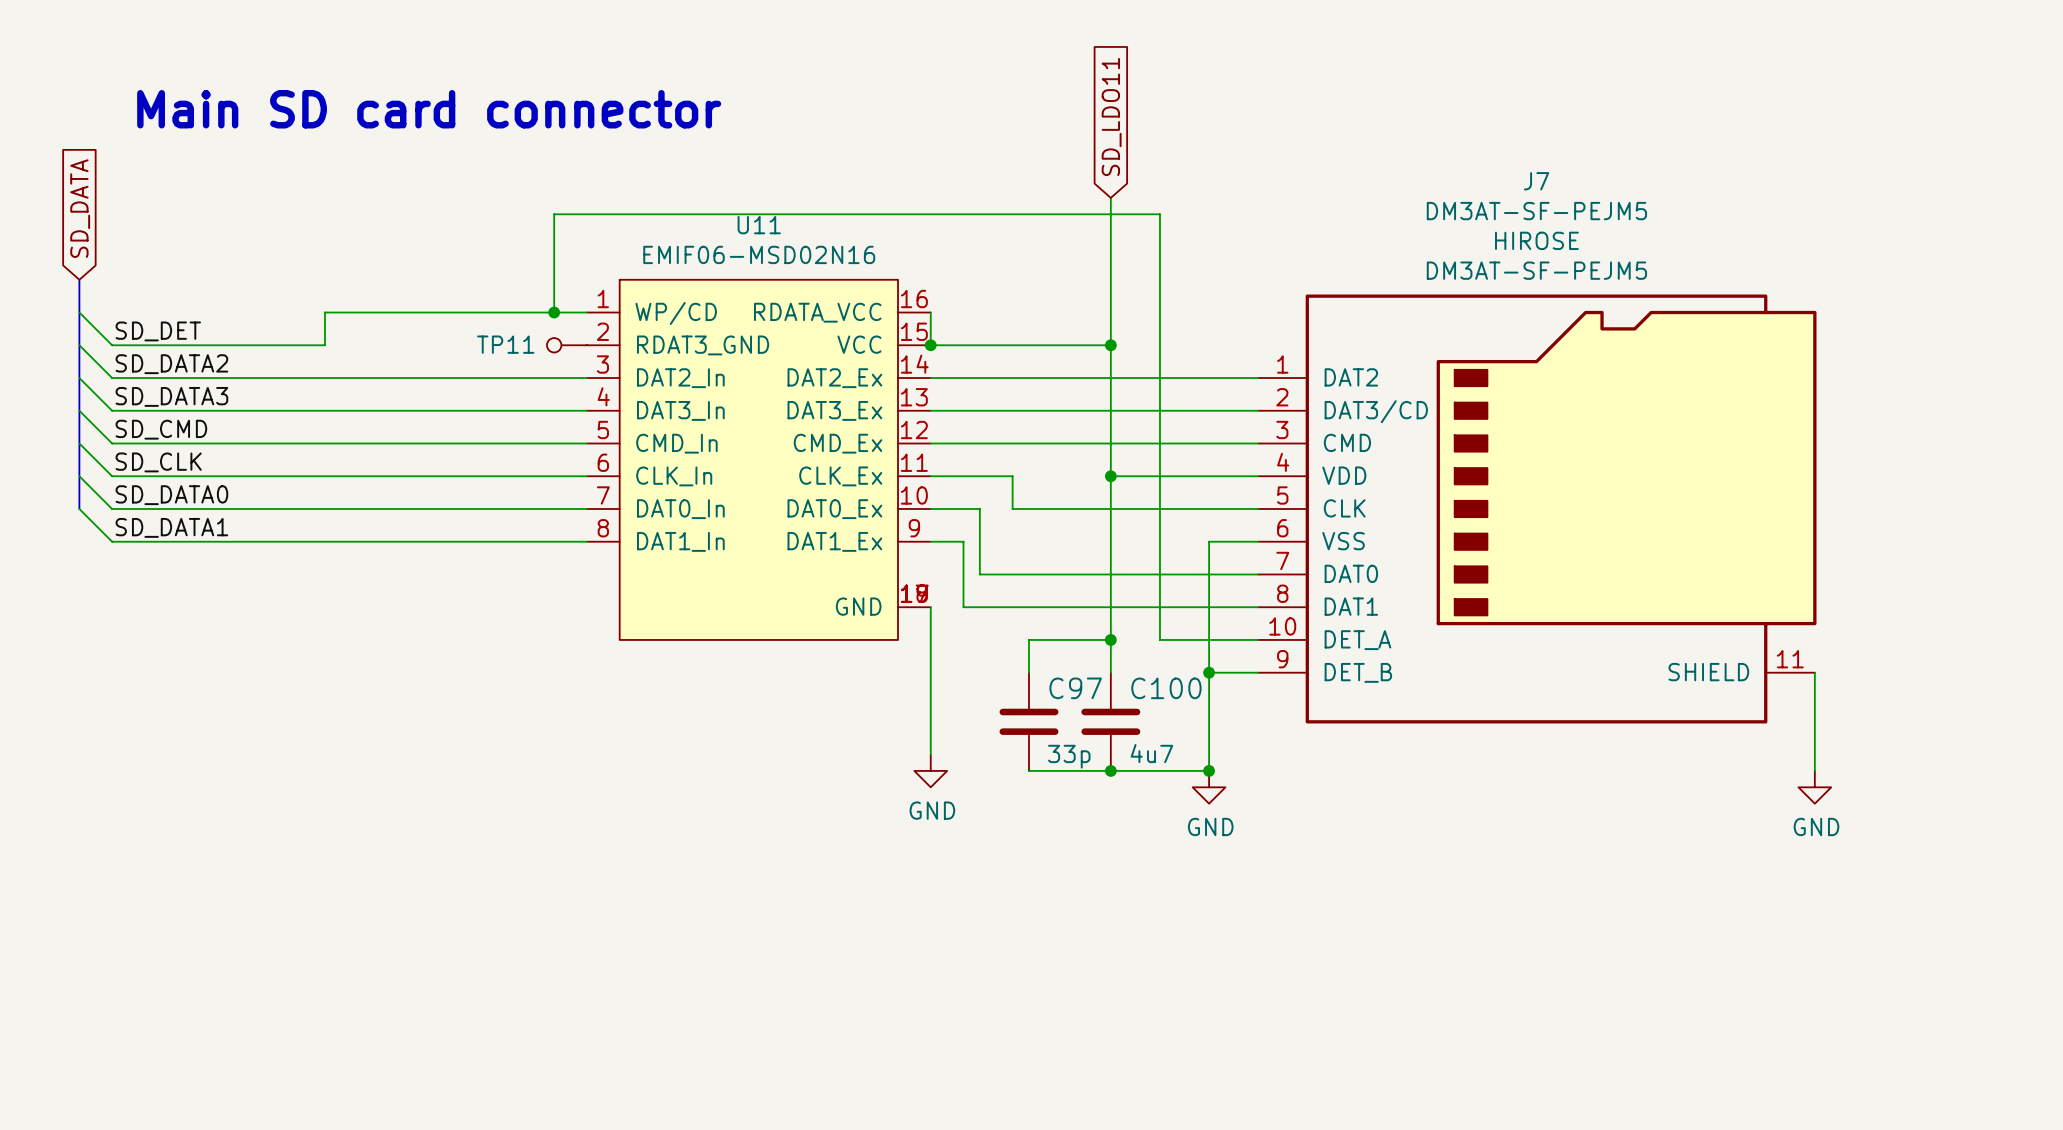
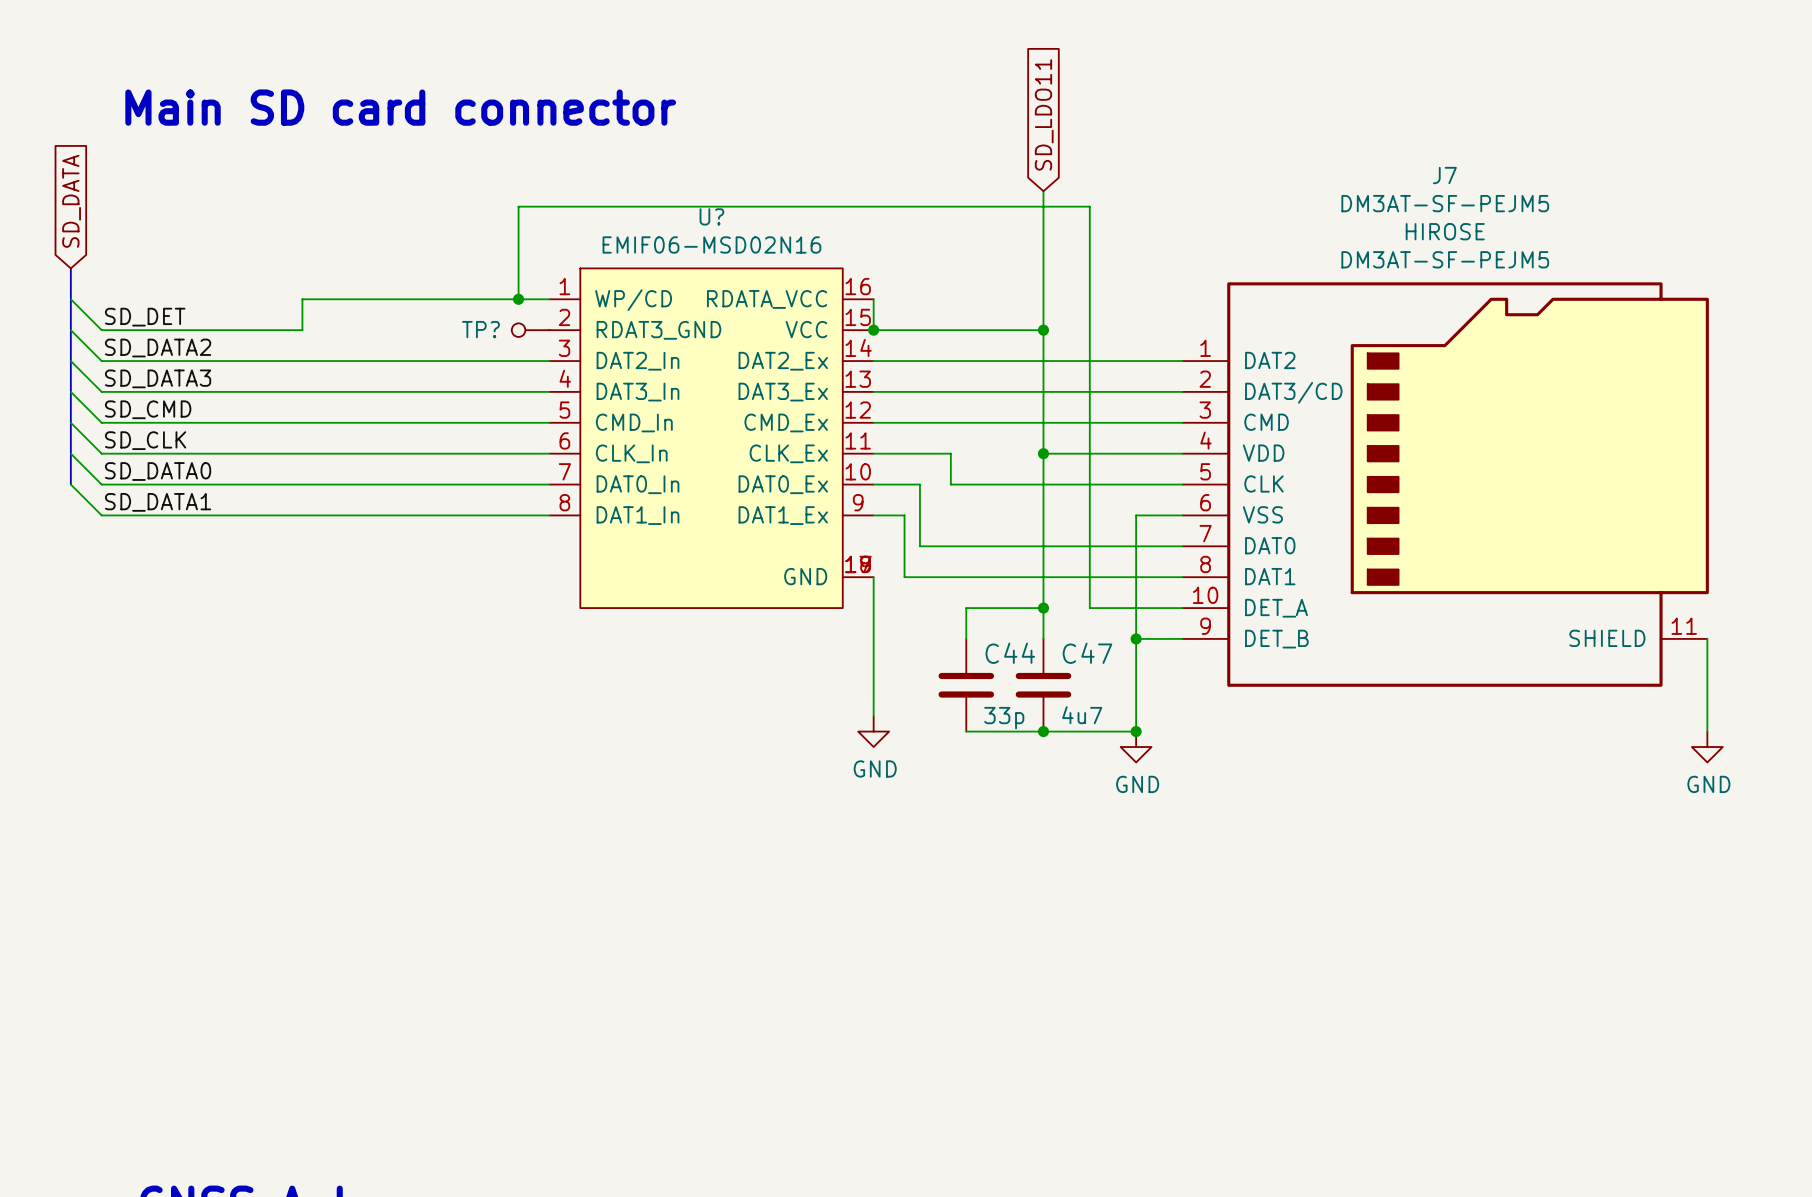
U11 name: U11 (759, 225) -> U? (711, 216)
TP11 name: TP11 (505, 344) -> TP? (480, 329)
C97 name: C97 (1075, 688) -> C44 (1010, 653)
C100 name: C100 (1166, 688) -> C47 (1087, 653)

